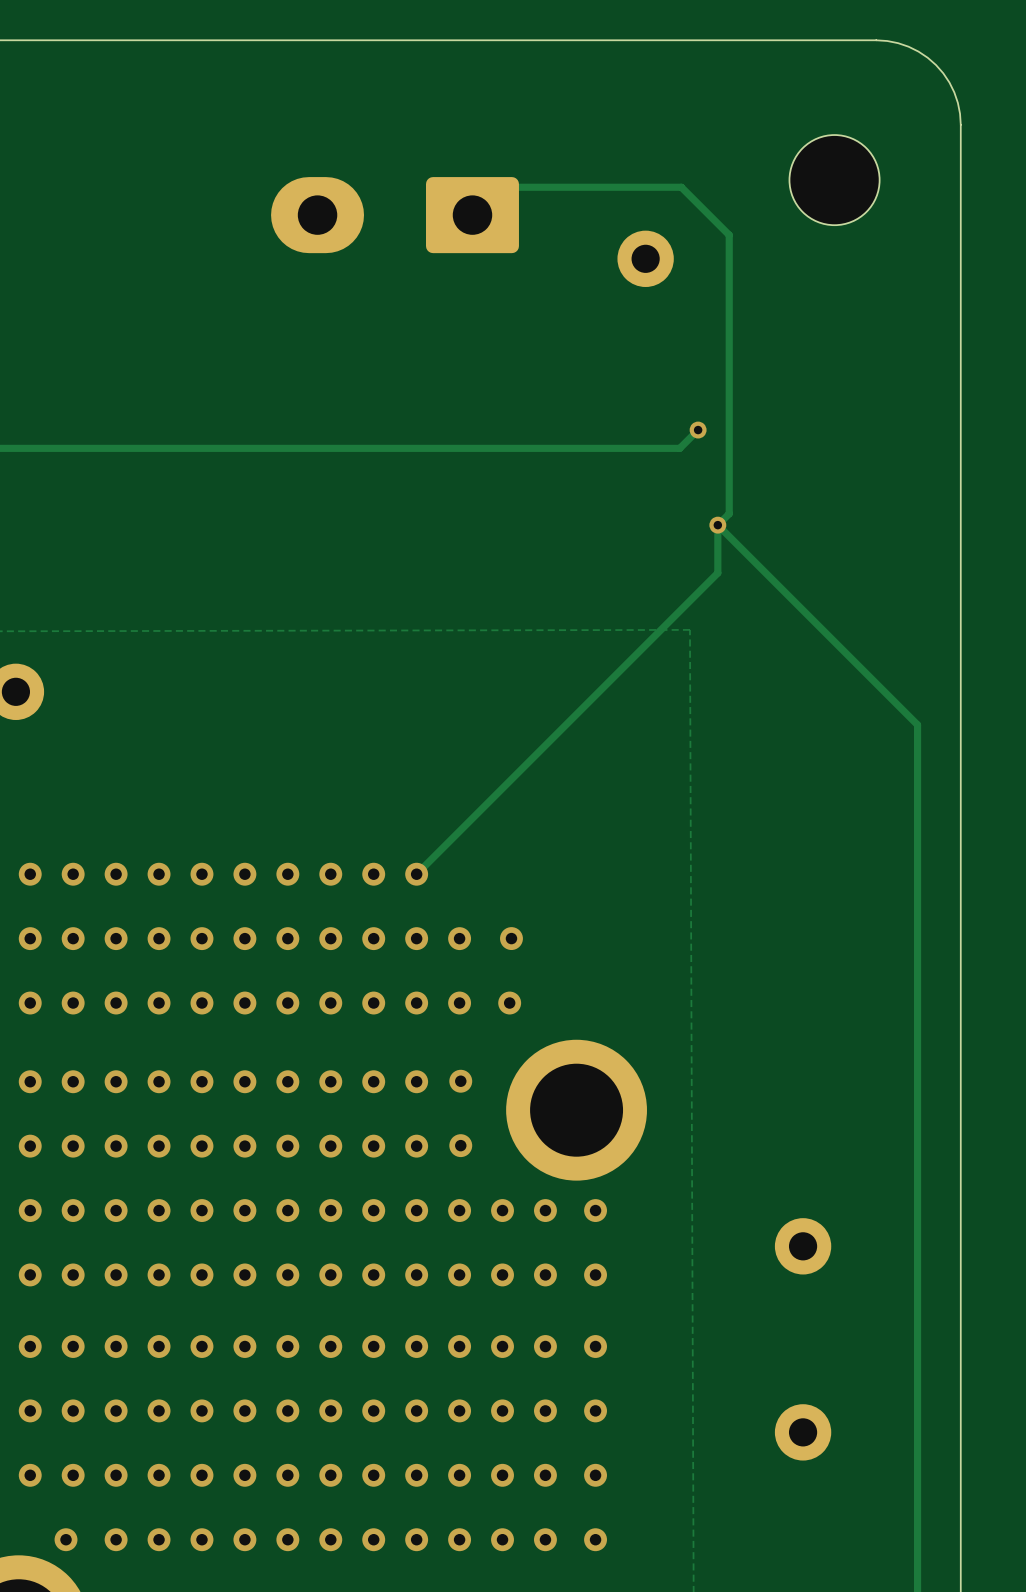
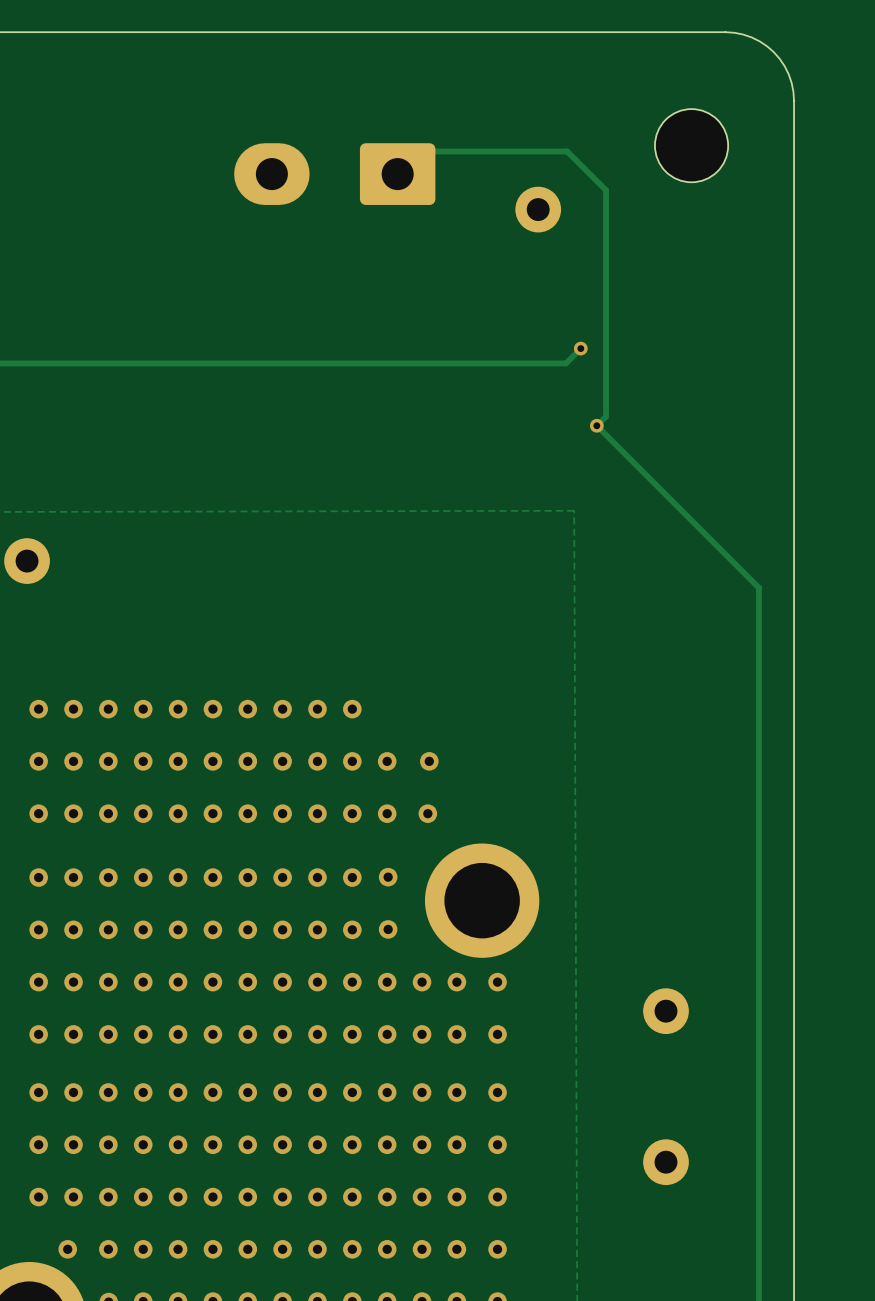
track: (717, 525) (717, 573) (416, 874) -> none

